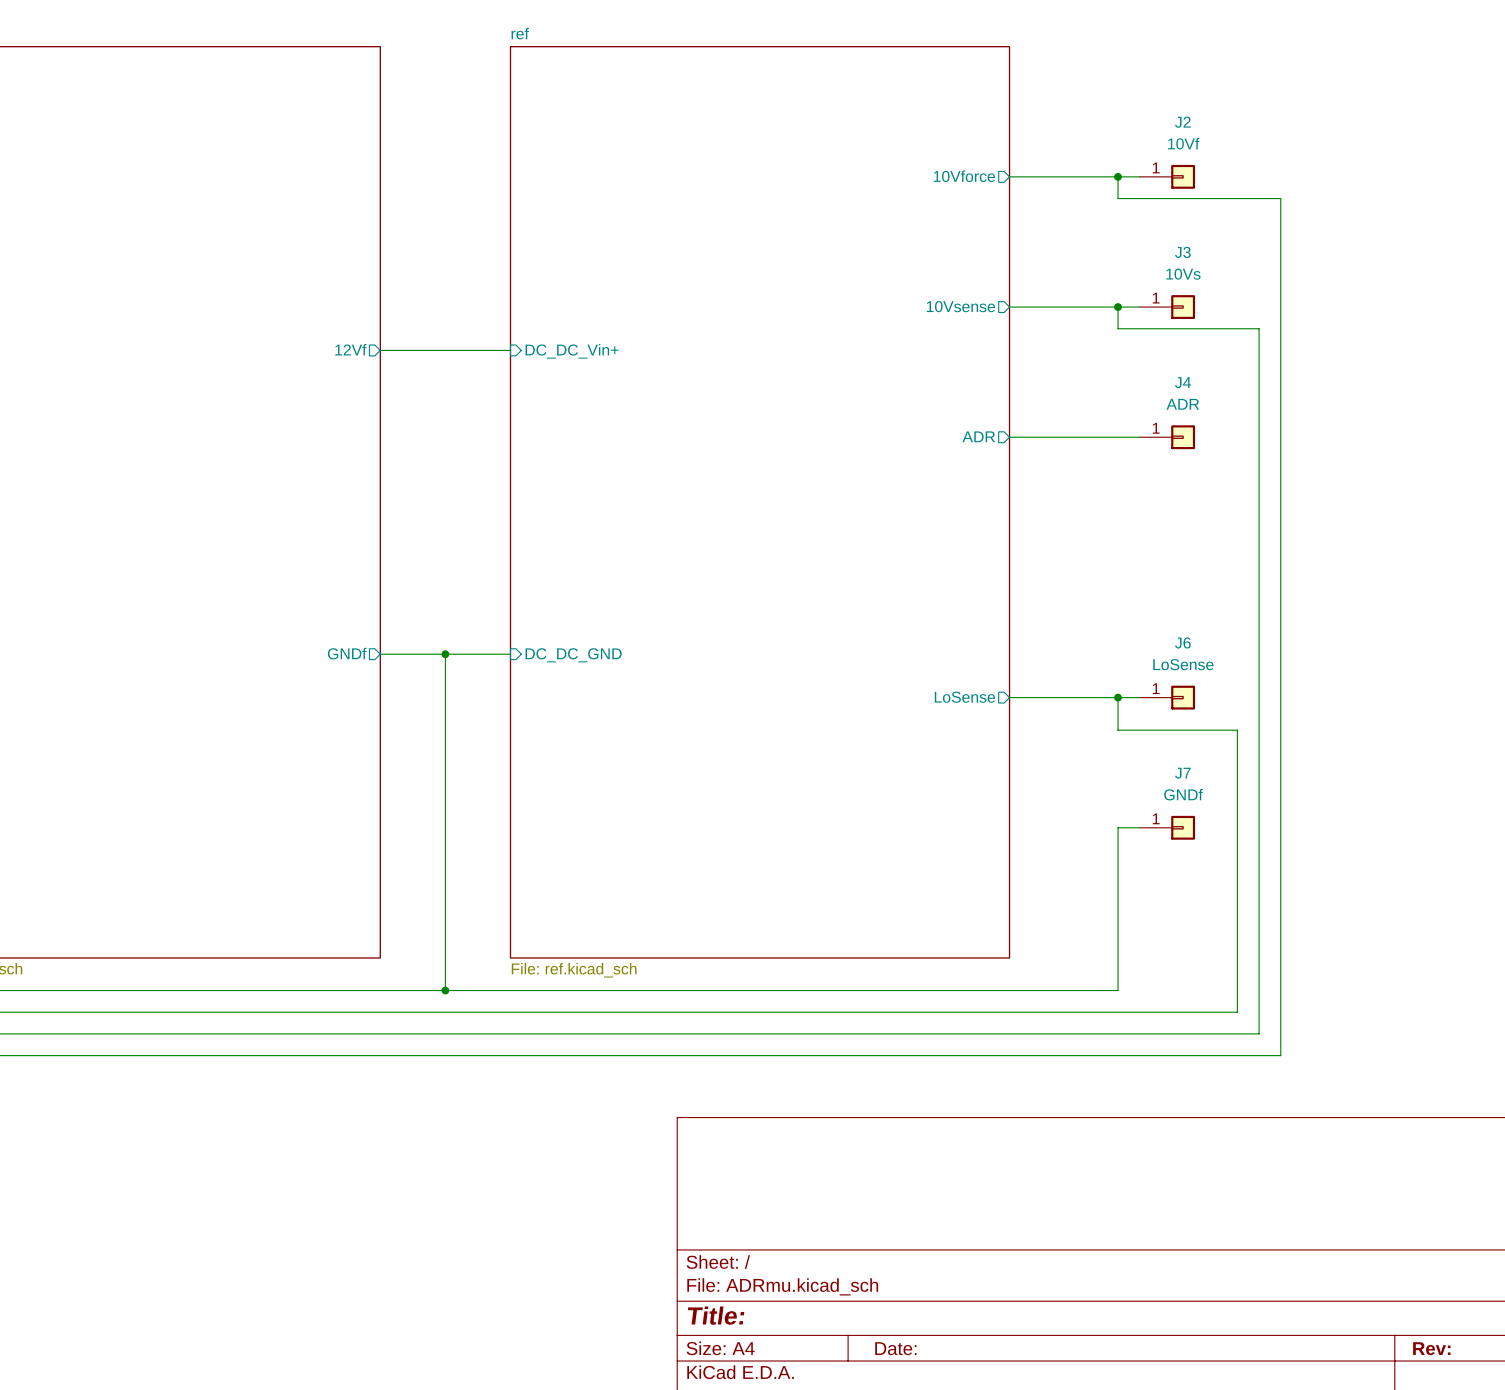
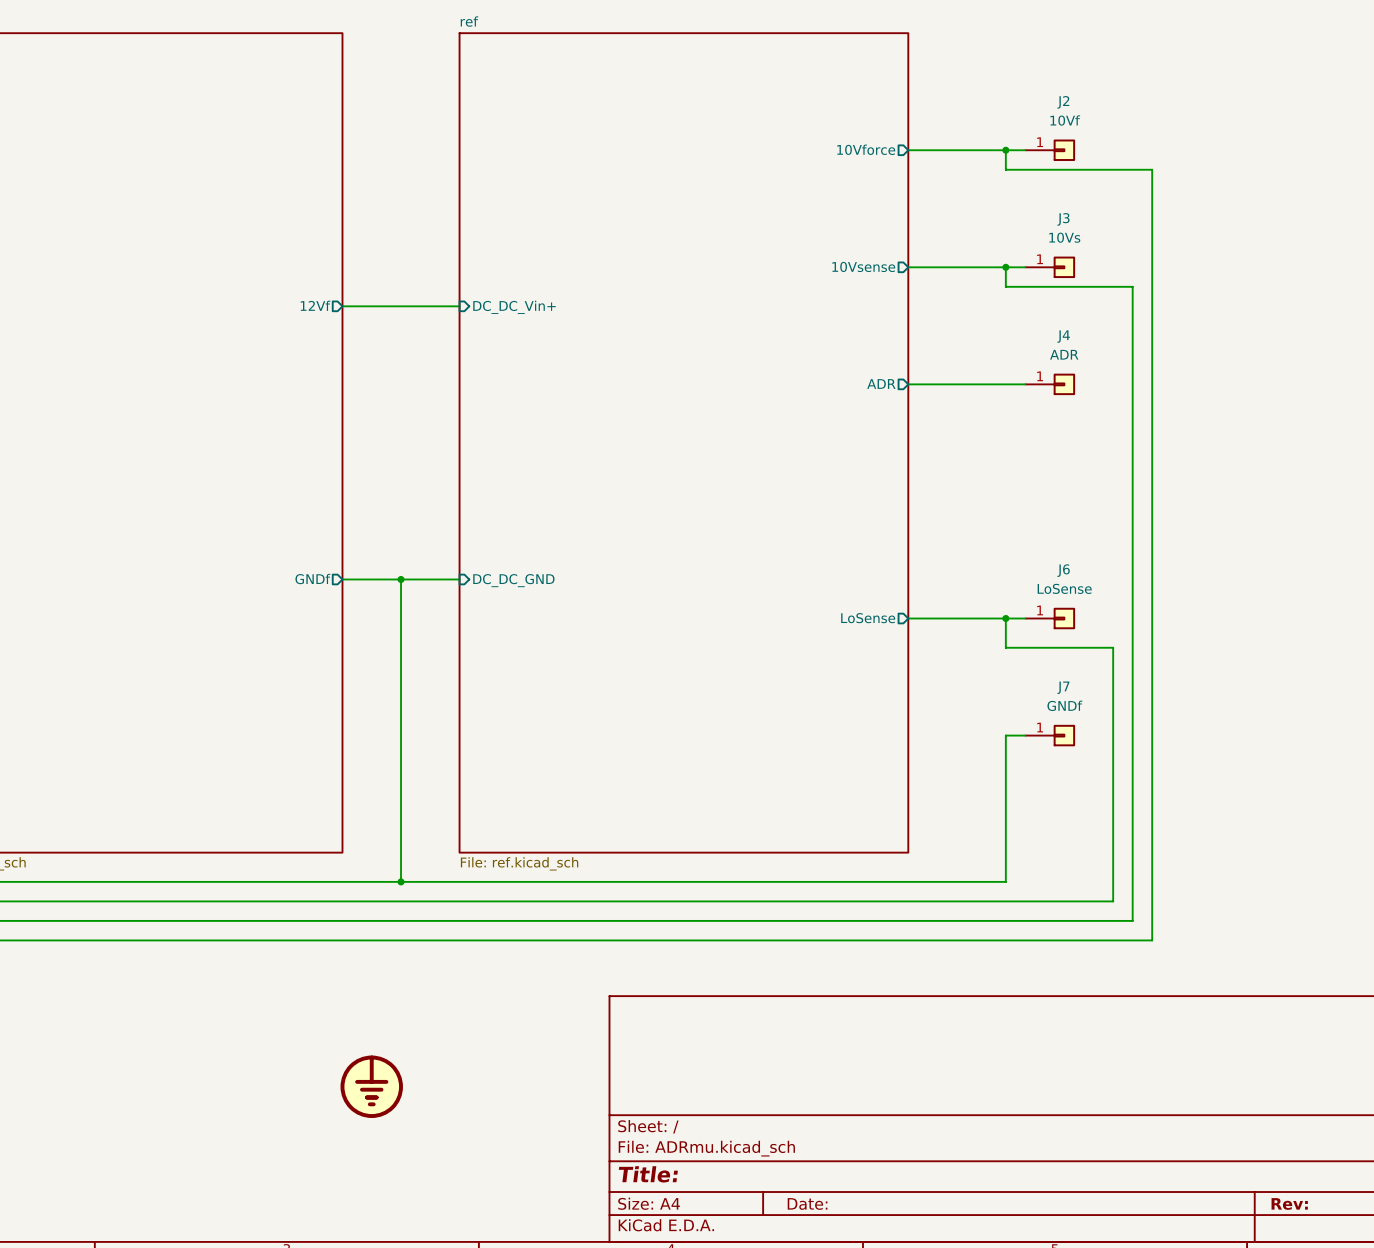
part: none -> (371, 1086)

